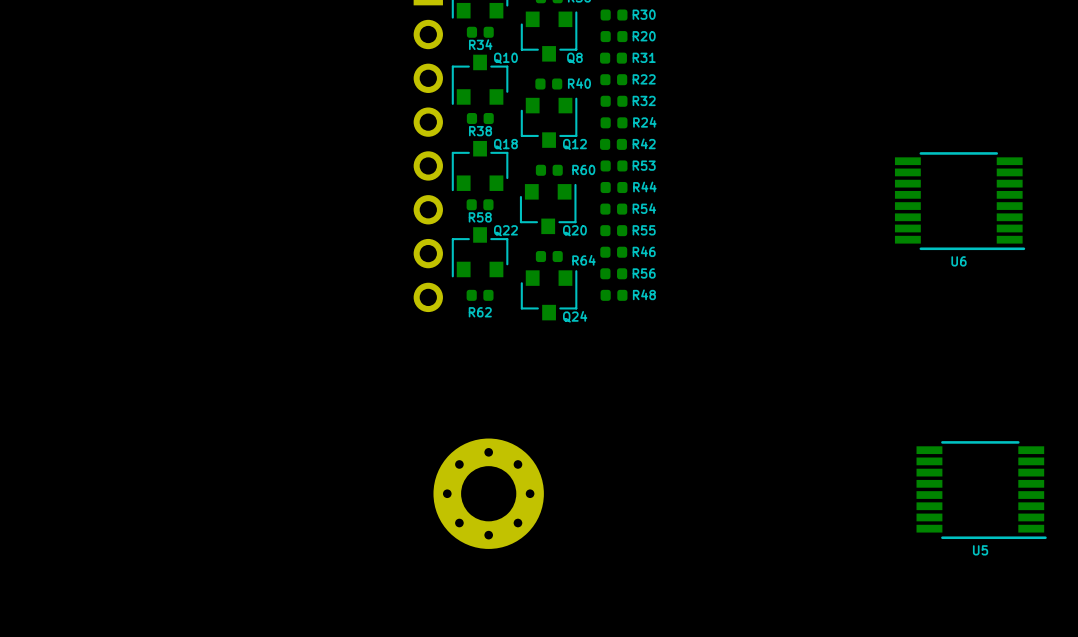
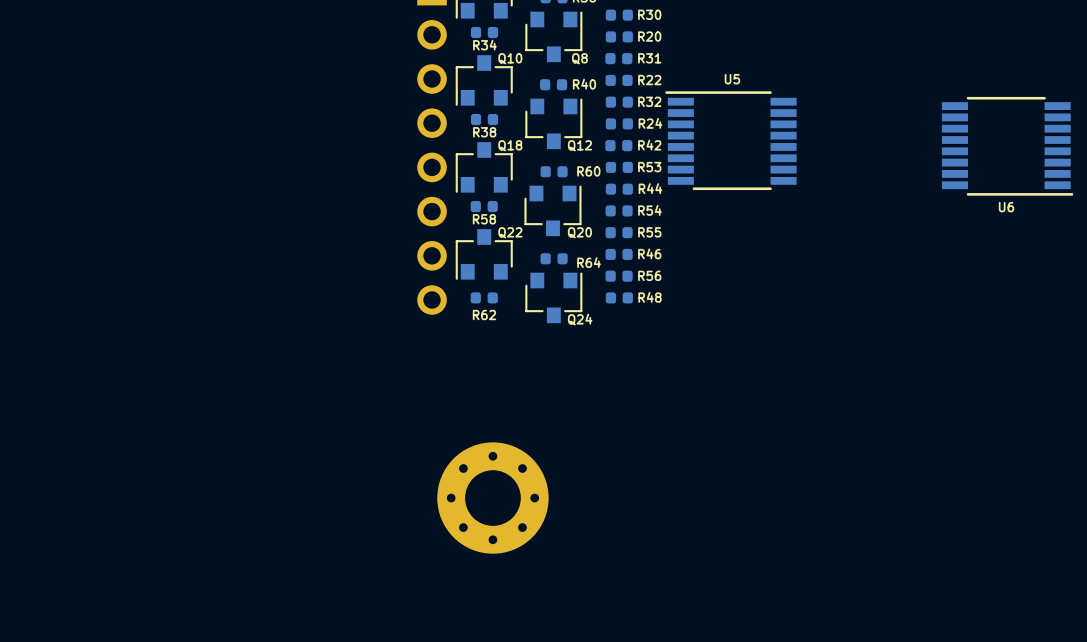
U6 position: (960, 201) -> (1007, 146)
U5 rotation: 0° (981, 490) -> 180° (730, 140)
U5 position: (981, 490) -> (730, 140)

